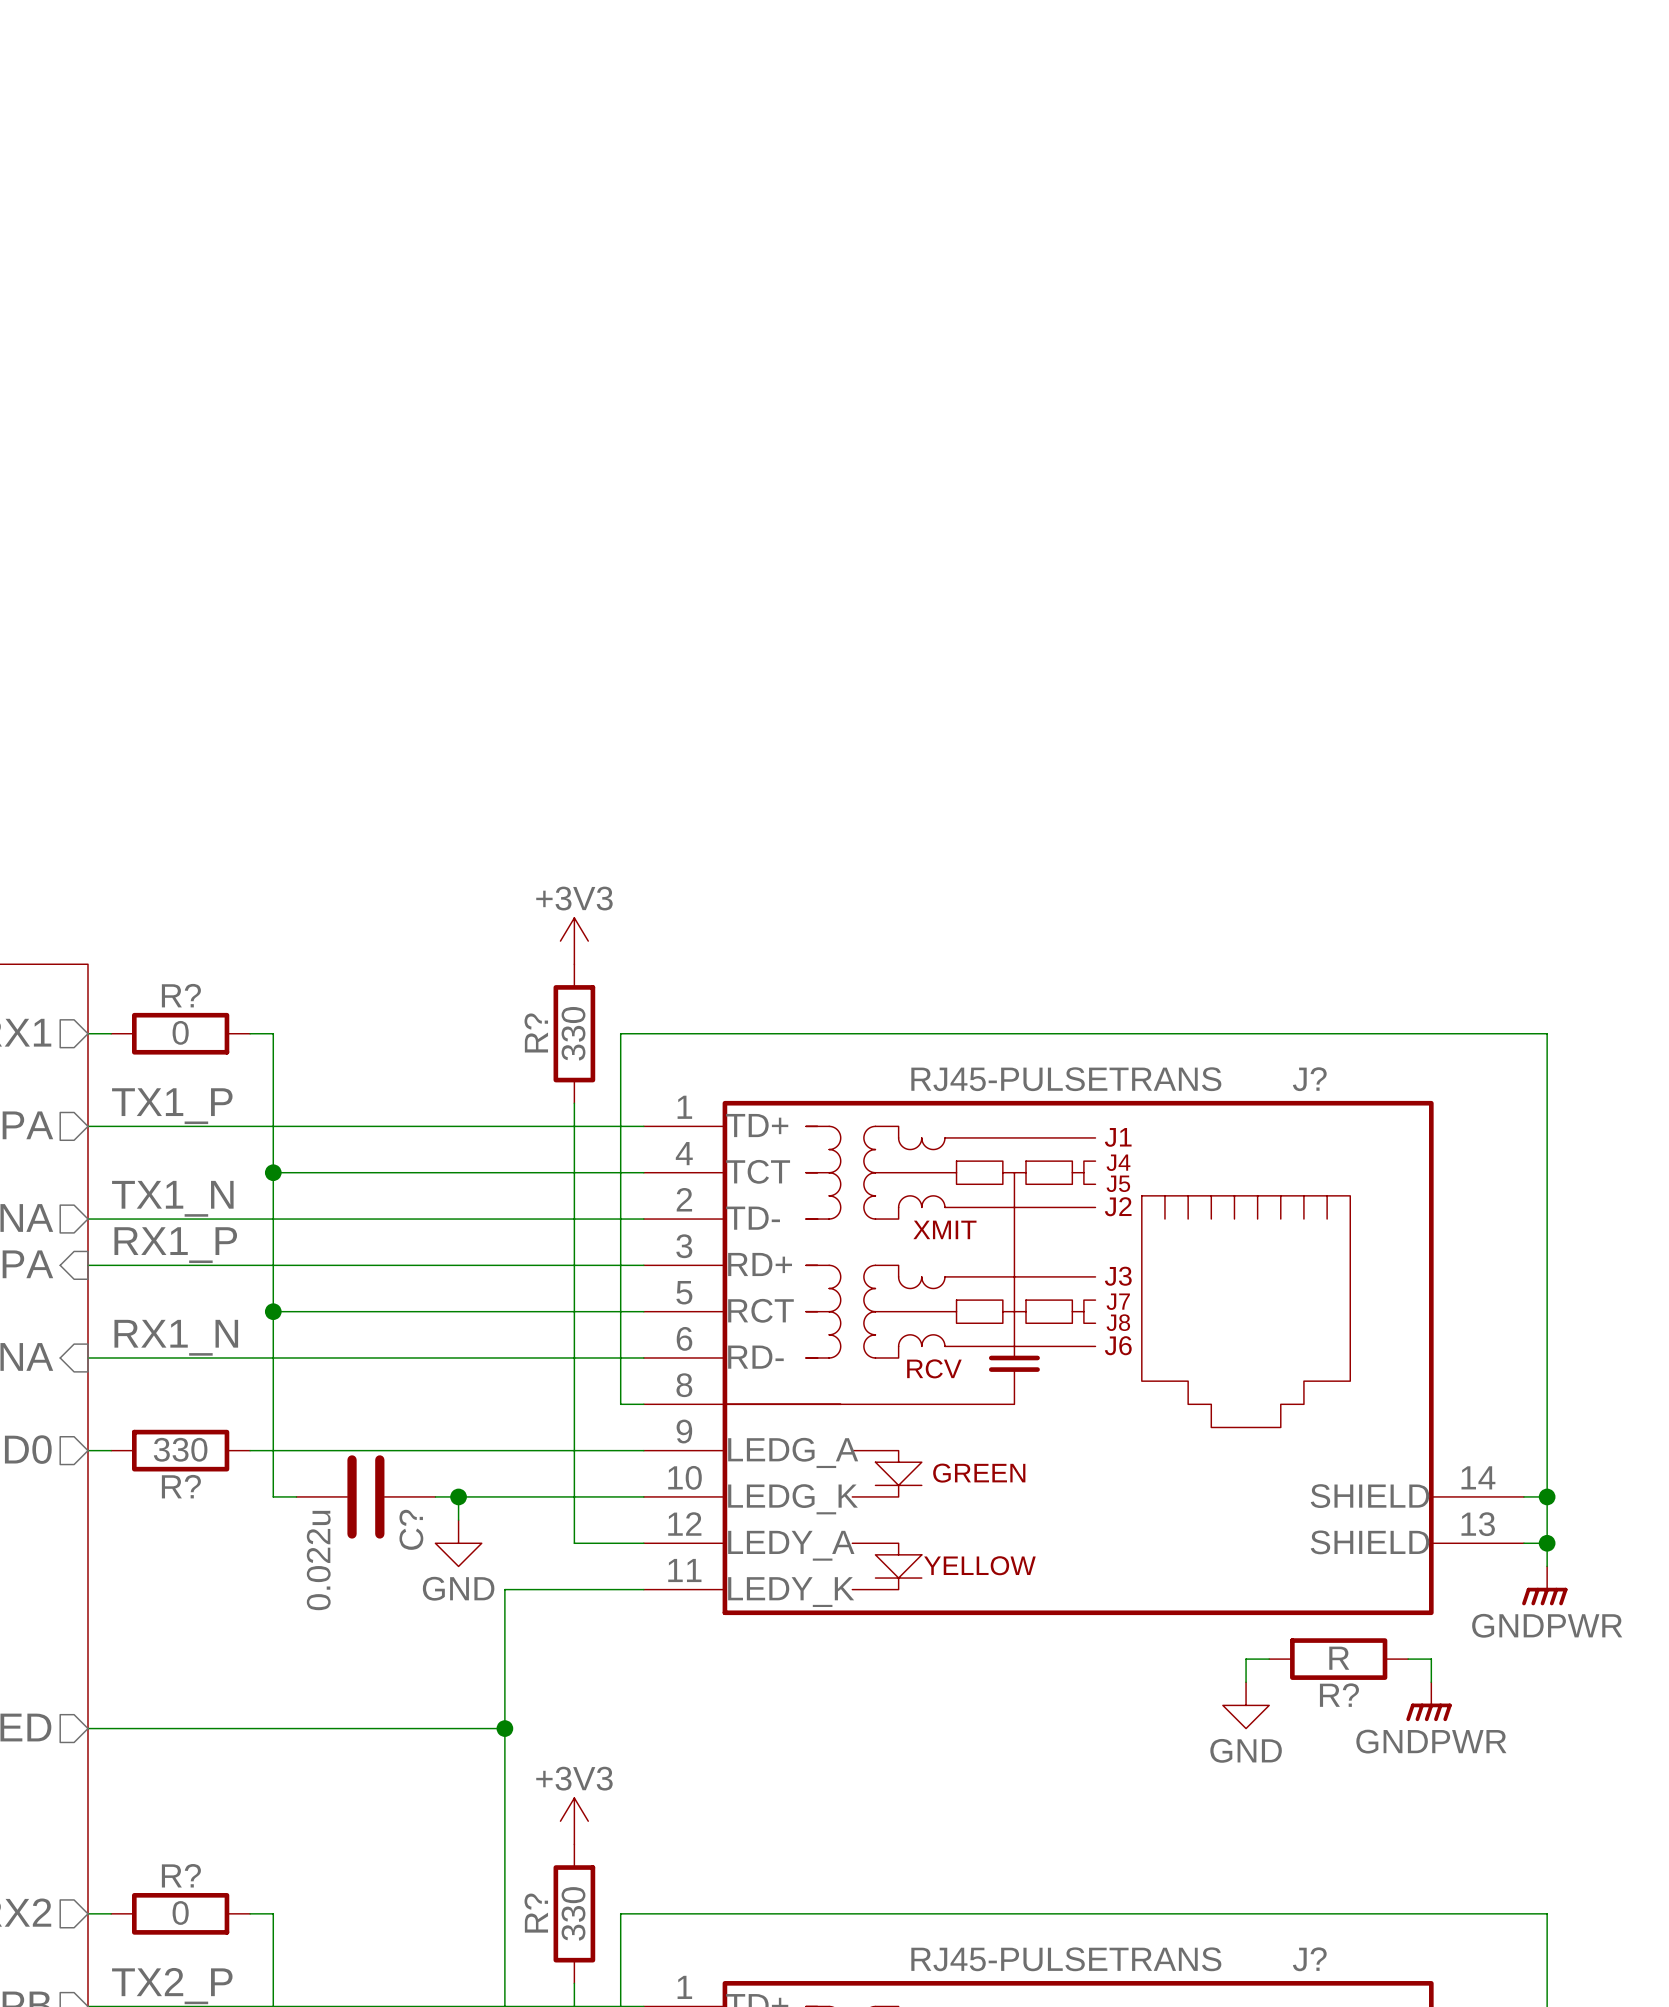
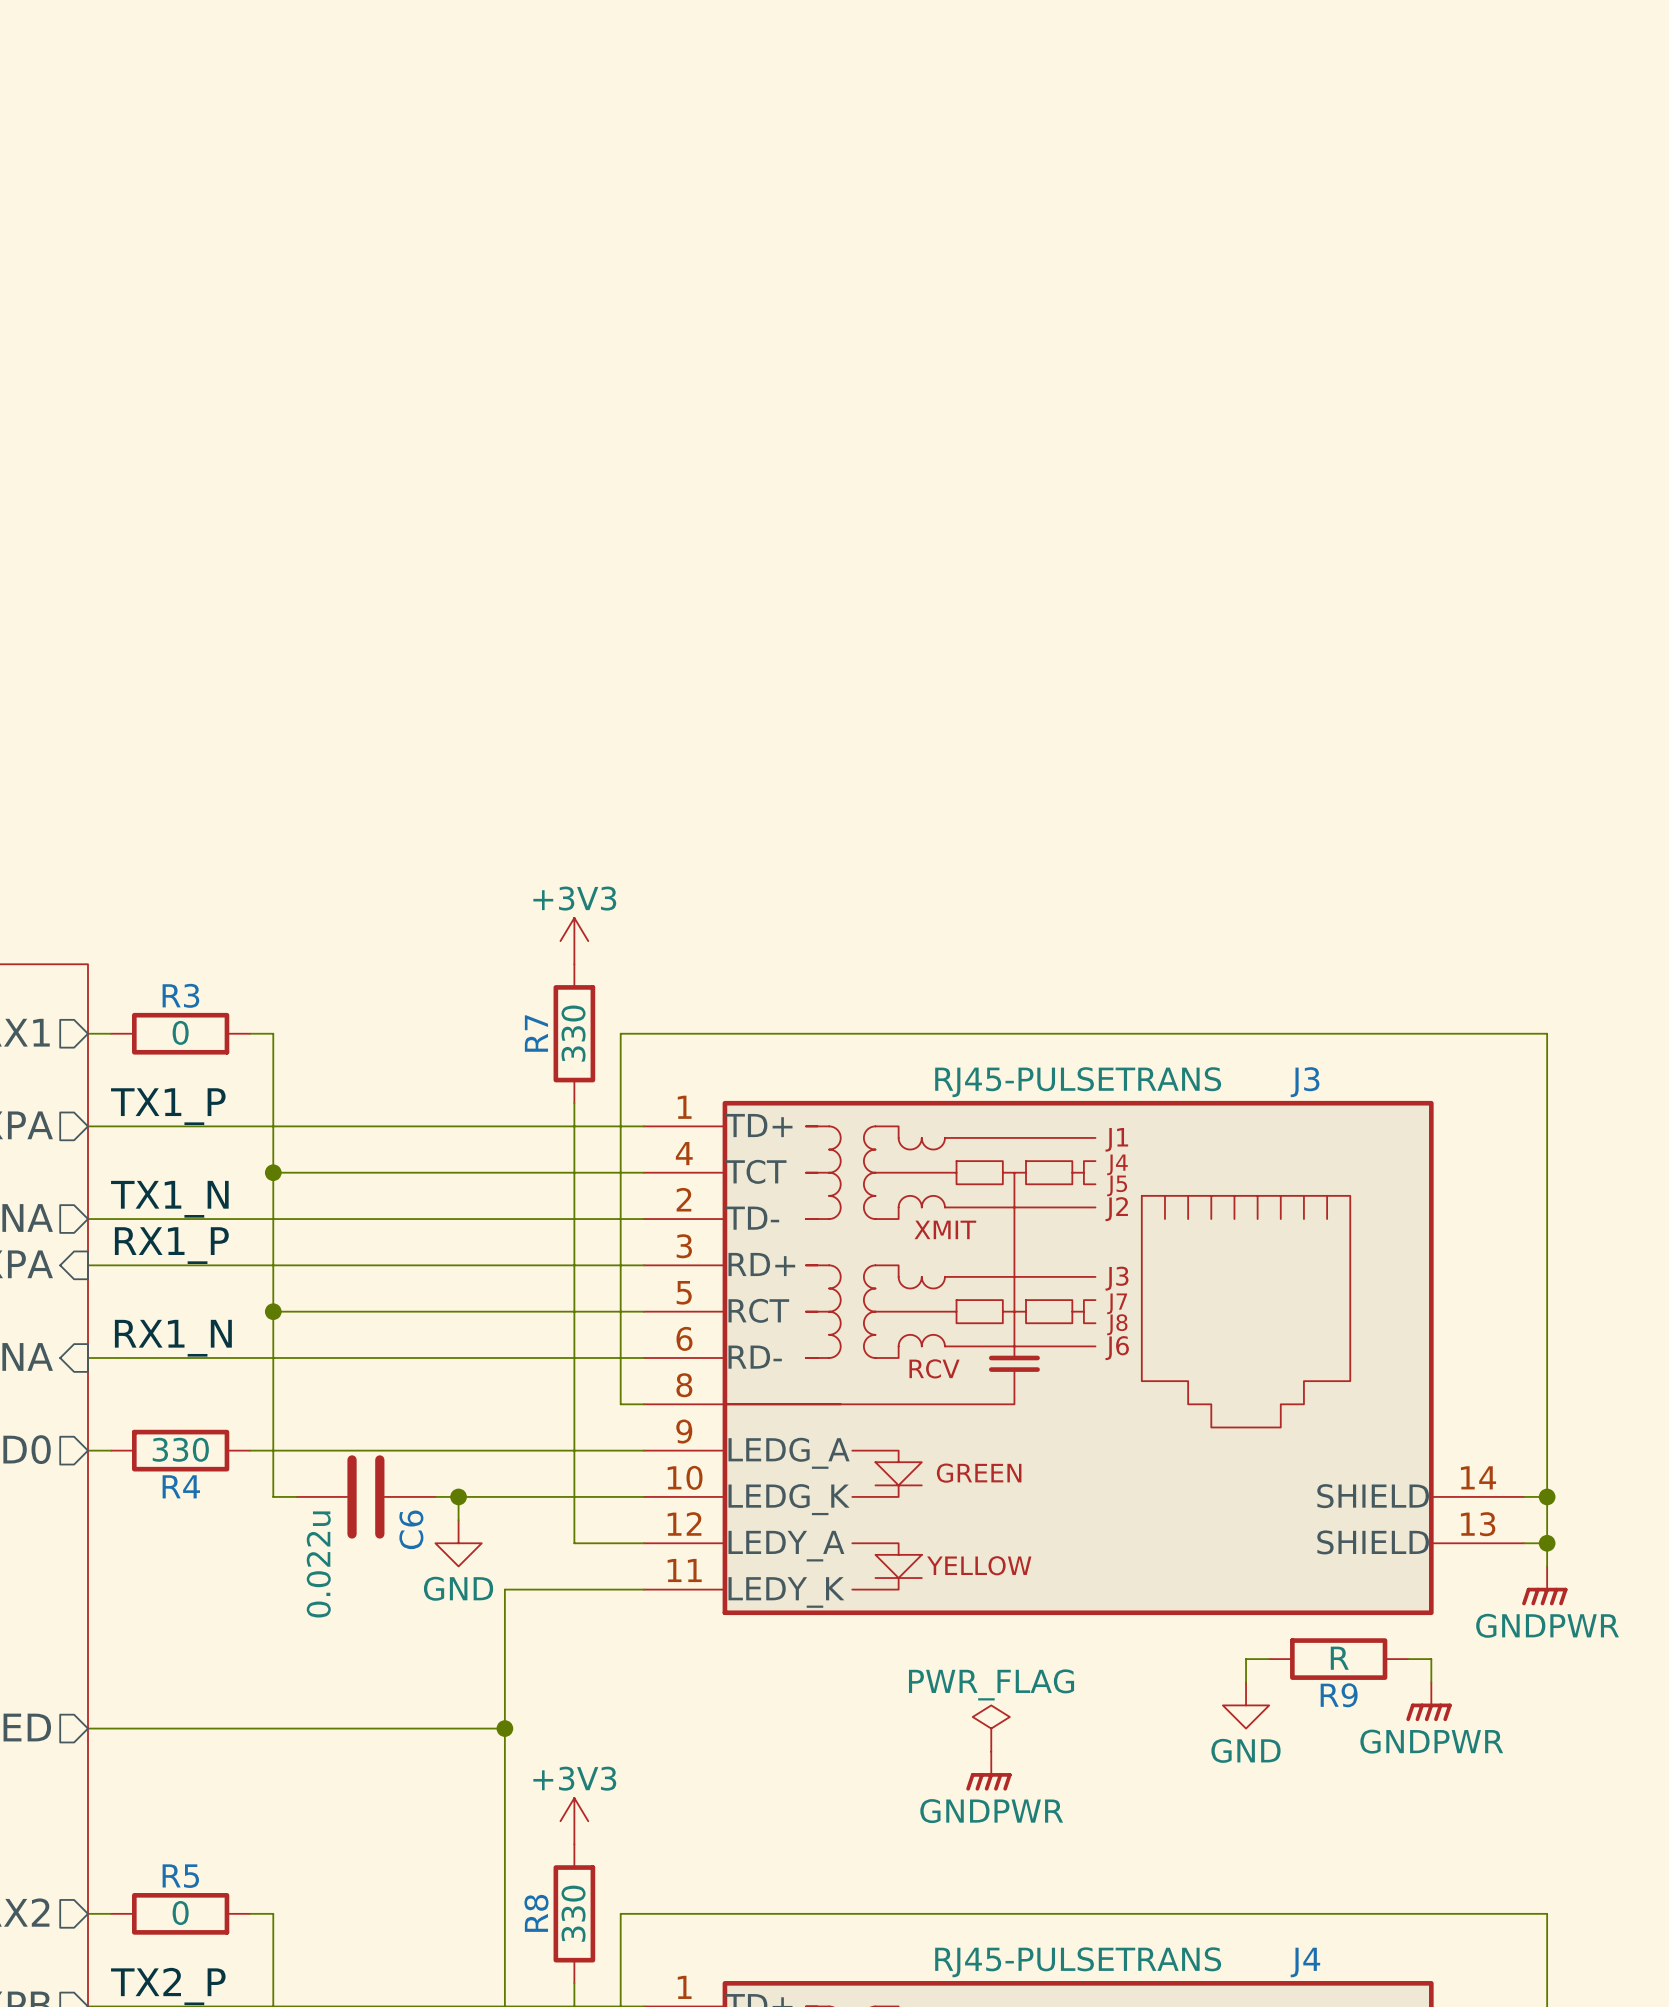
R? name: R? (181, 995) -> R3 (180, 995)
R? name: R? (536, 1032) -> R7 (536, 1033)
J? name: J? (1309, 1079) -> J3 (1305, 1082)
R? name: R? (181, 1486) -> R4 (181, 1486)
C? name: C? (411, 1529) -> C6 (411, 1529)
R? name: R? (1339, 1695) -> R9 (1339, 1695)
power symbol: none -> PWR_FLAG (991, 1728)
power symbol: none -> GNDPWR (988, 1771)
R? name: R? (181, 1875) -> R5 (180, 1876)
R? name: R? (536, 1913) -> R8 (536, 1913)
J? name: J? (1309, 1959) -> J4 (1305, 1962)

